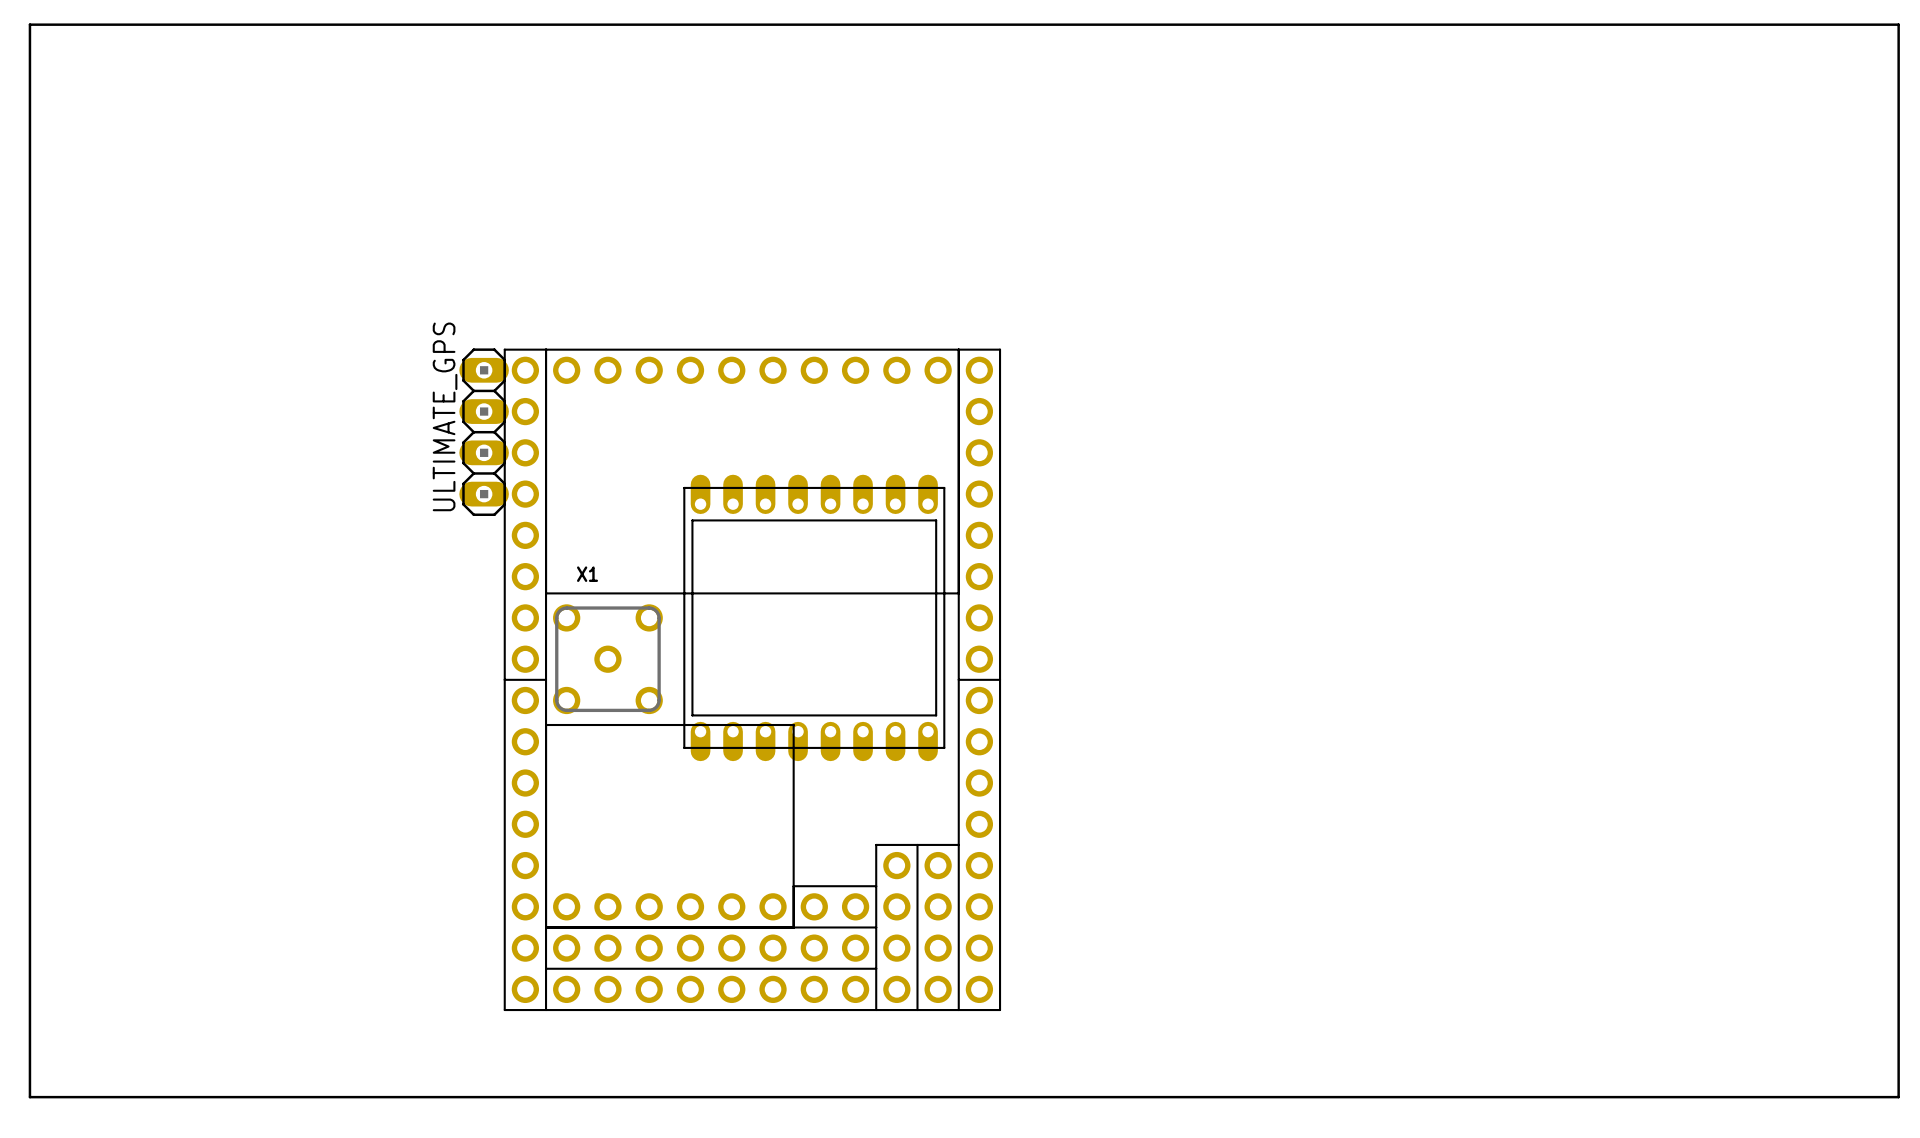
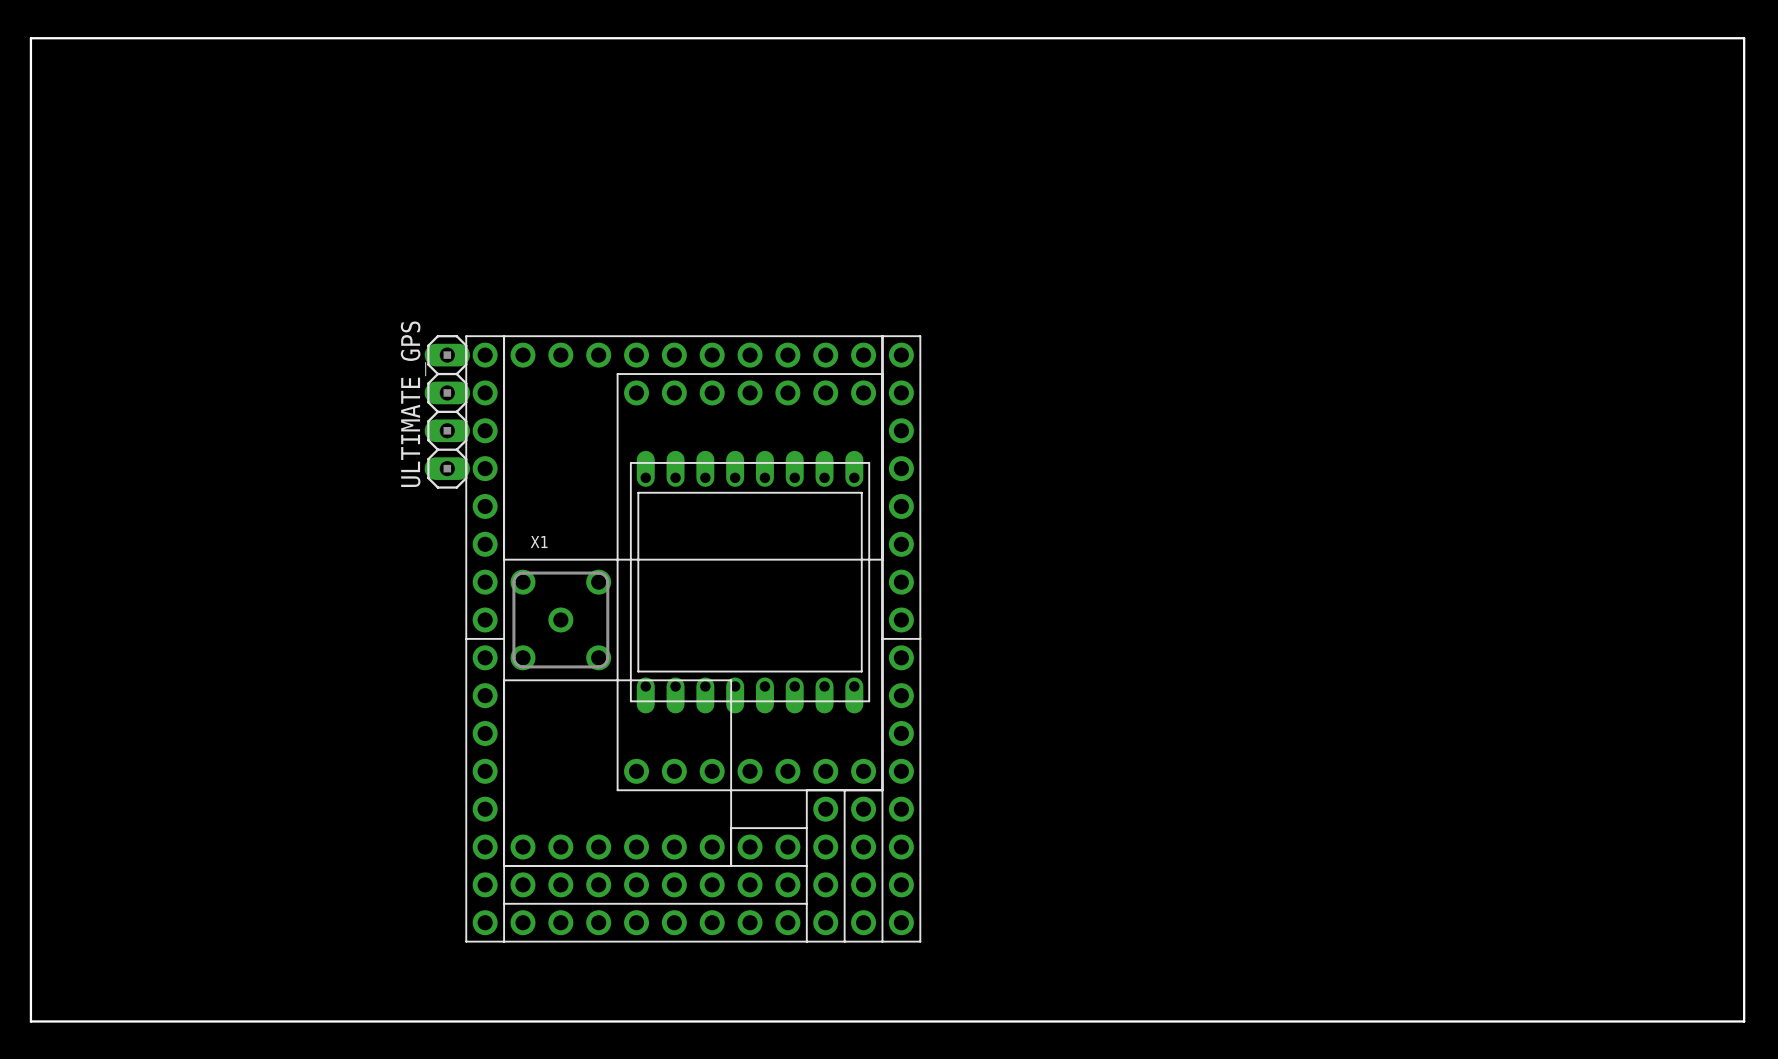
part footprint: [683, 474, 946, 762] -> [616, 373, 884, 792]

